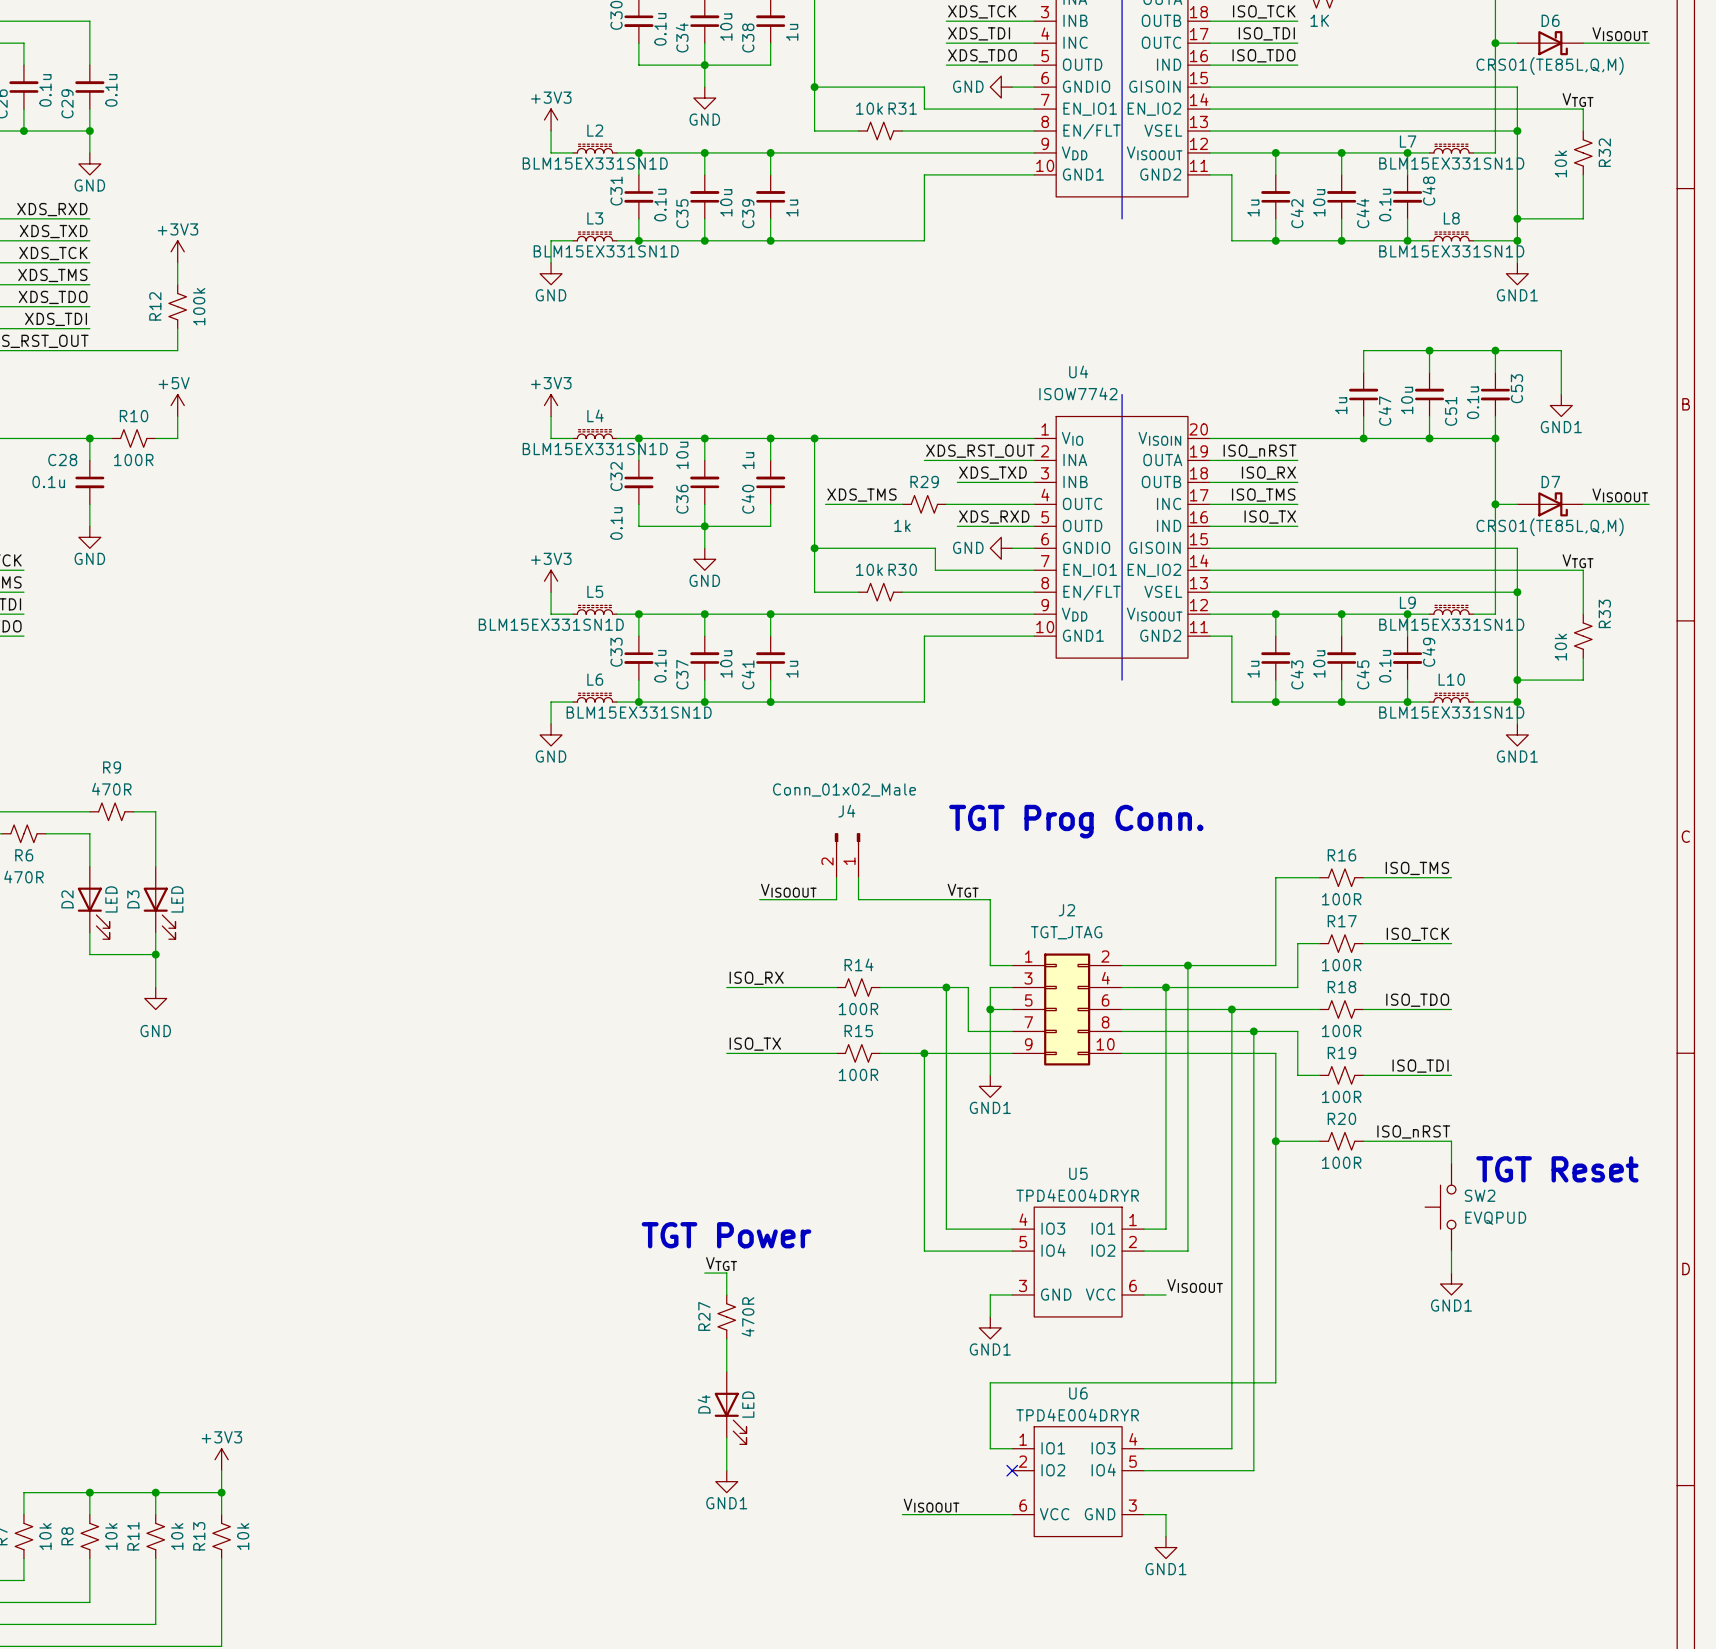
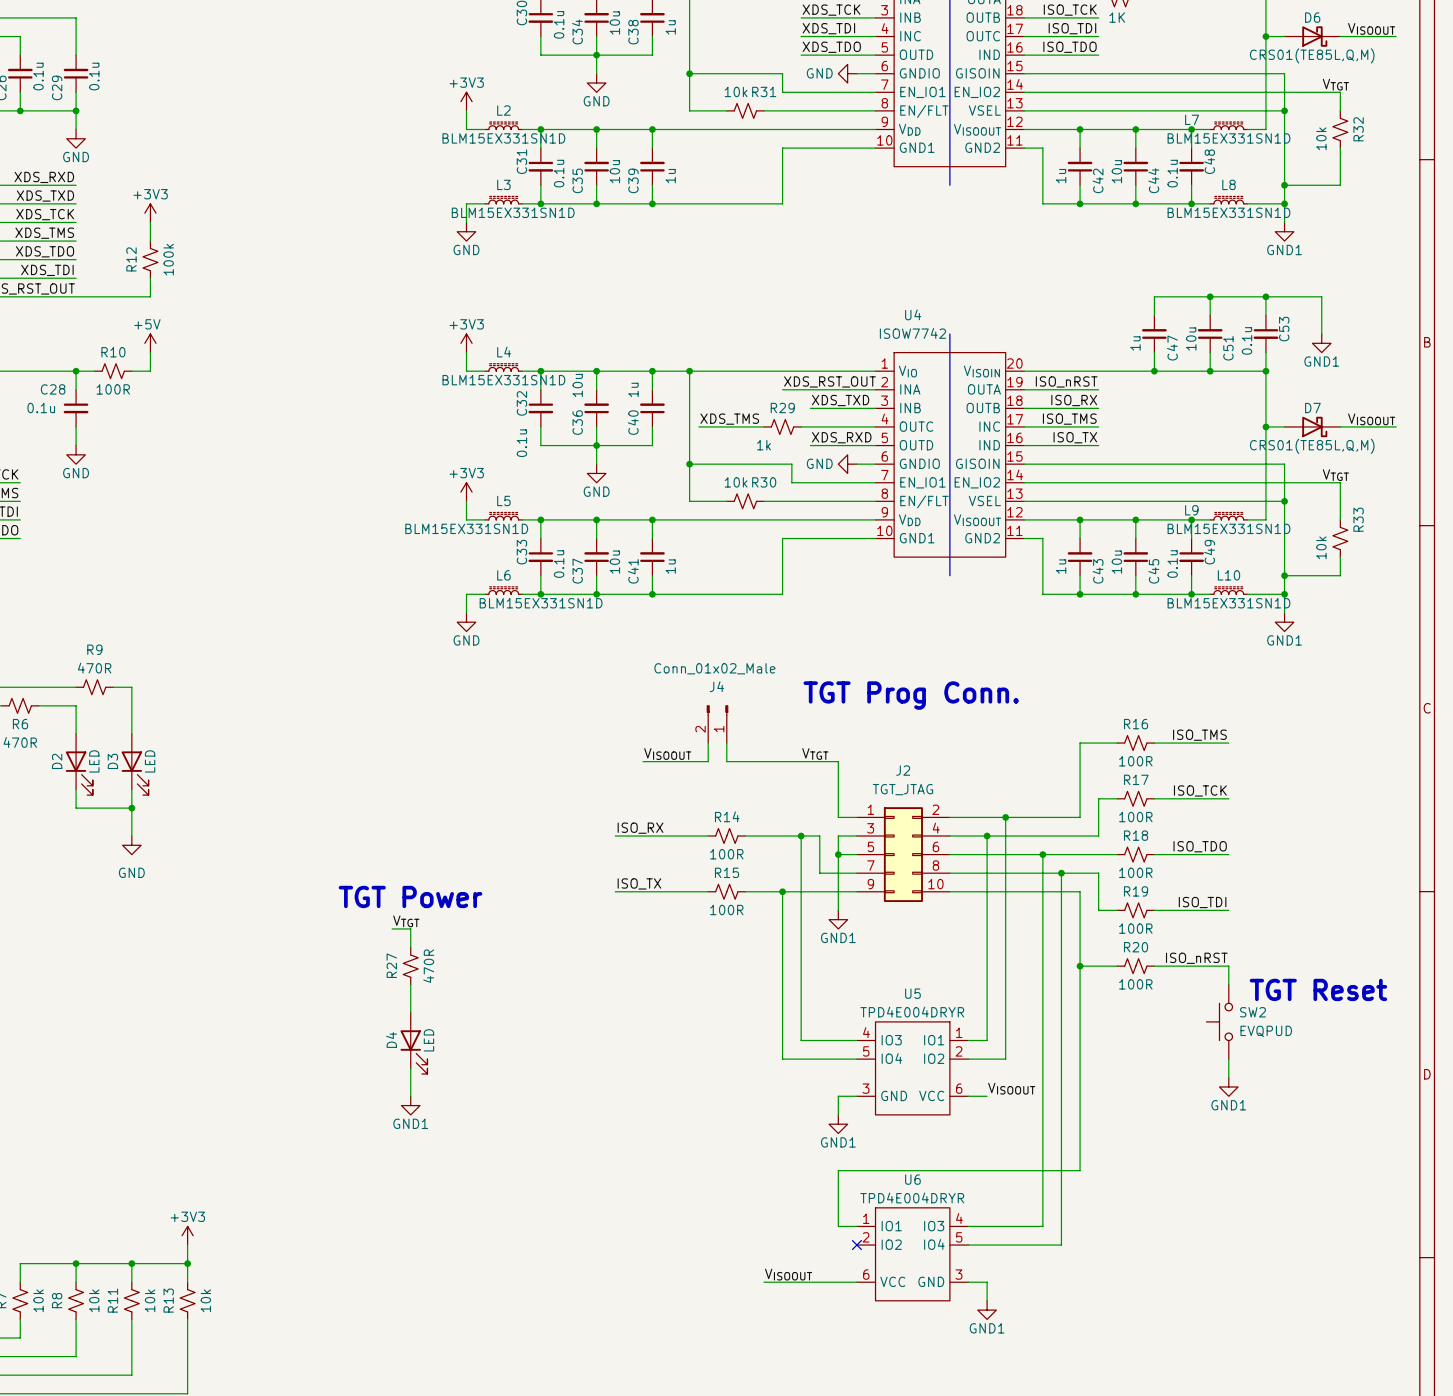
text: none -> TGT Power (410, 896)
label: none -> VTGT (406, 921)
wire: none -> (392, 928) (410, 928) (410, 947)
wire: none -> (410, 984) (410, 1012)
text: TGT Power (726, 1235) -> none
wire: none -> (410, 1068) (410, 1096)
label: VTGT (721, 1264) -> none
wire: (704, 1273) (726, 1273) (726, 1294) -> none
power symbol: none -> GND1 (410, 1105)
R27 position: (726, 1316) -> (410, 966)
wire: (726, 1338) (726, 1371) -> none
D4 position: (730, 1408) -> (413, 1043)
wire: (726, 1437) (726, 1470) -> none
power symbol: GND1 (726, 1481) -> none

